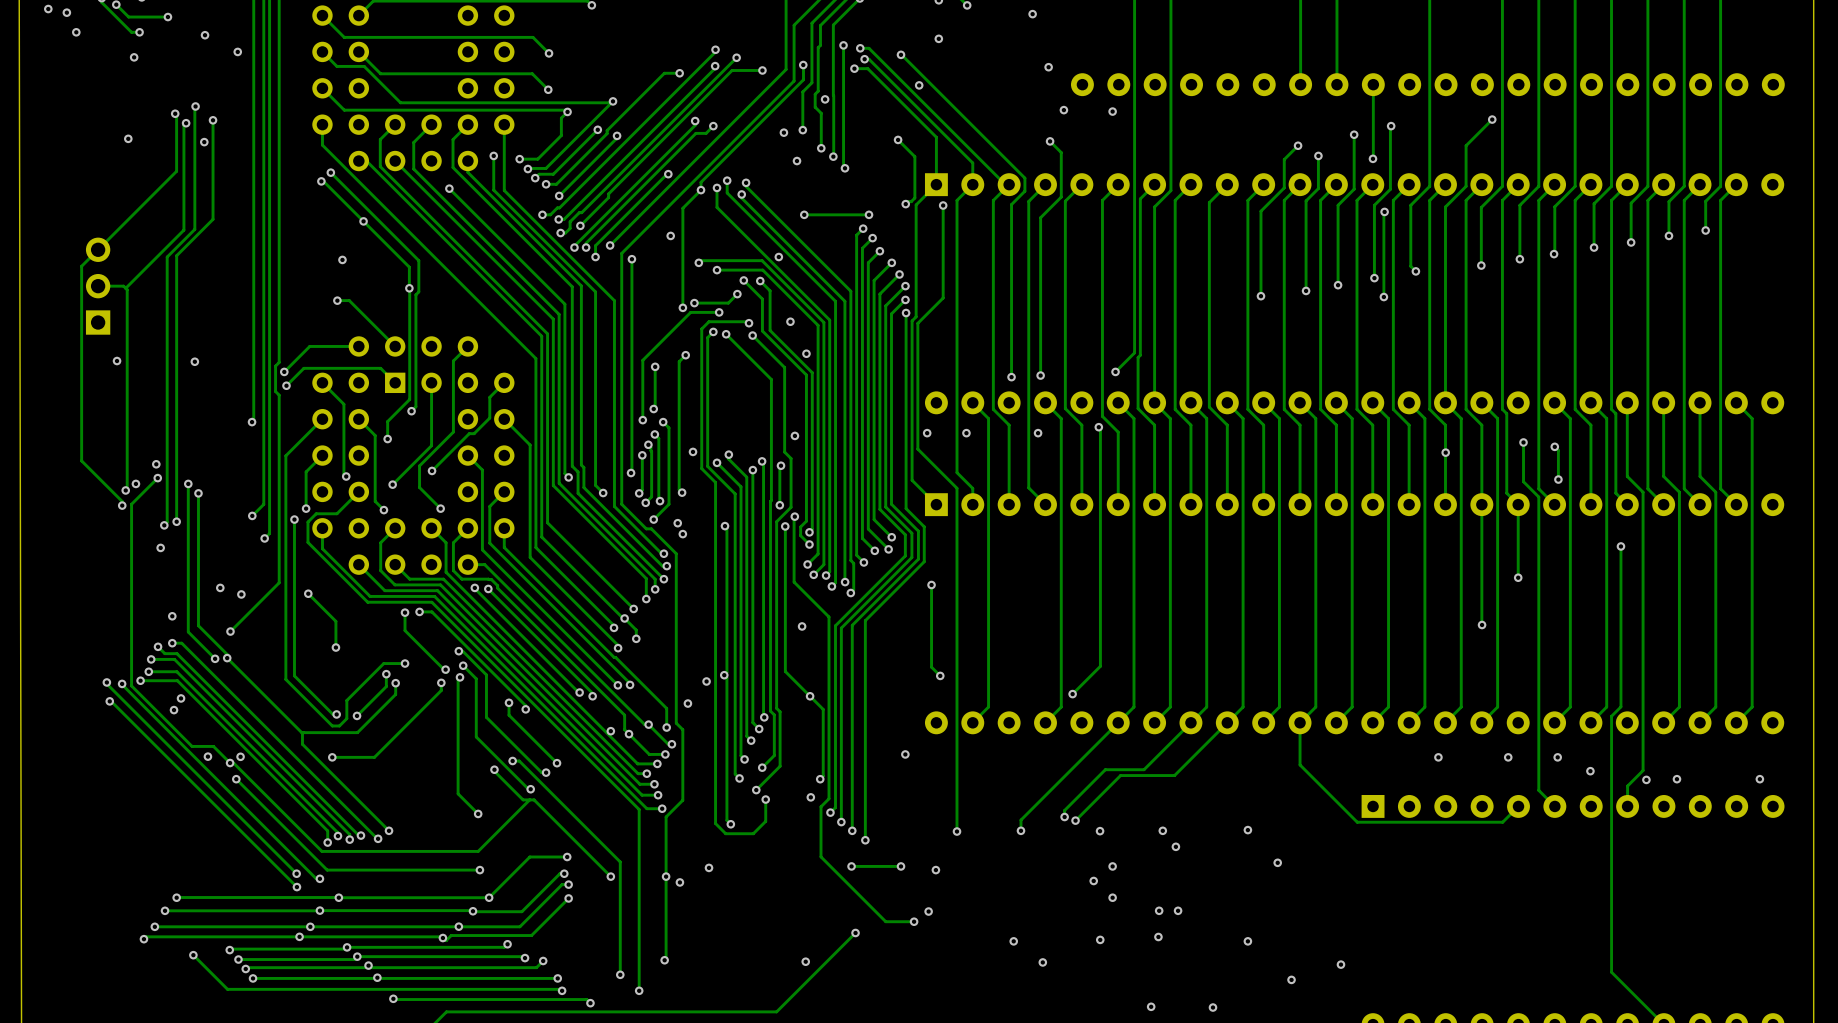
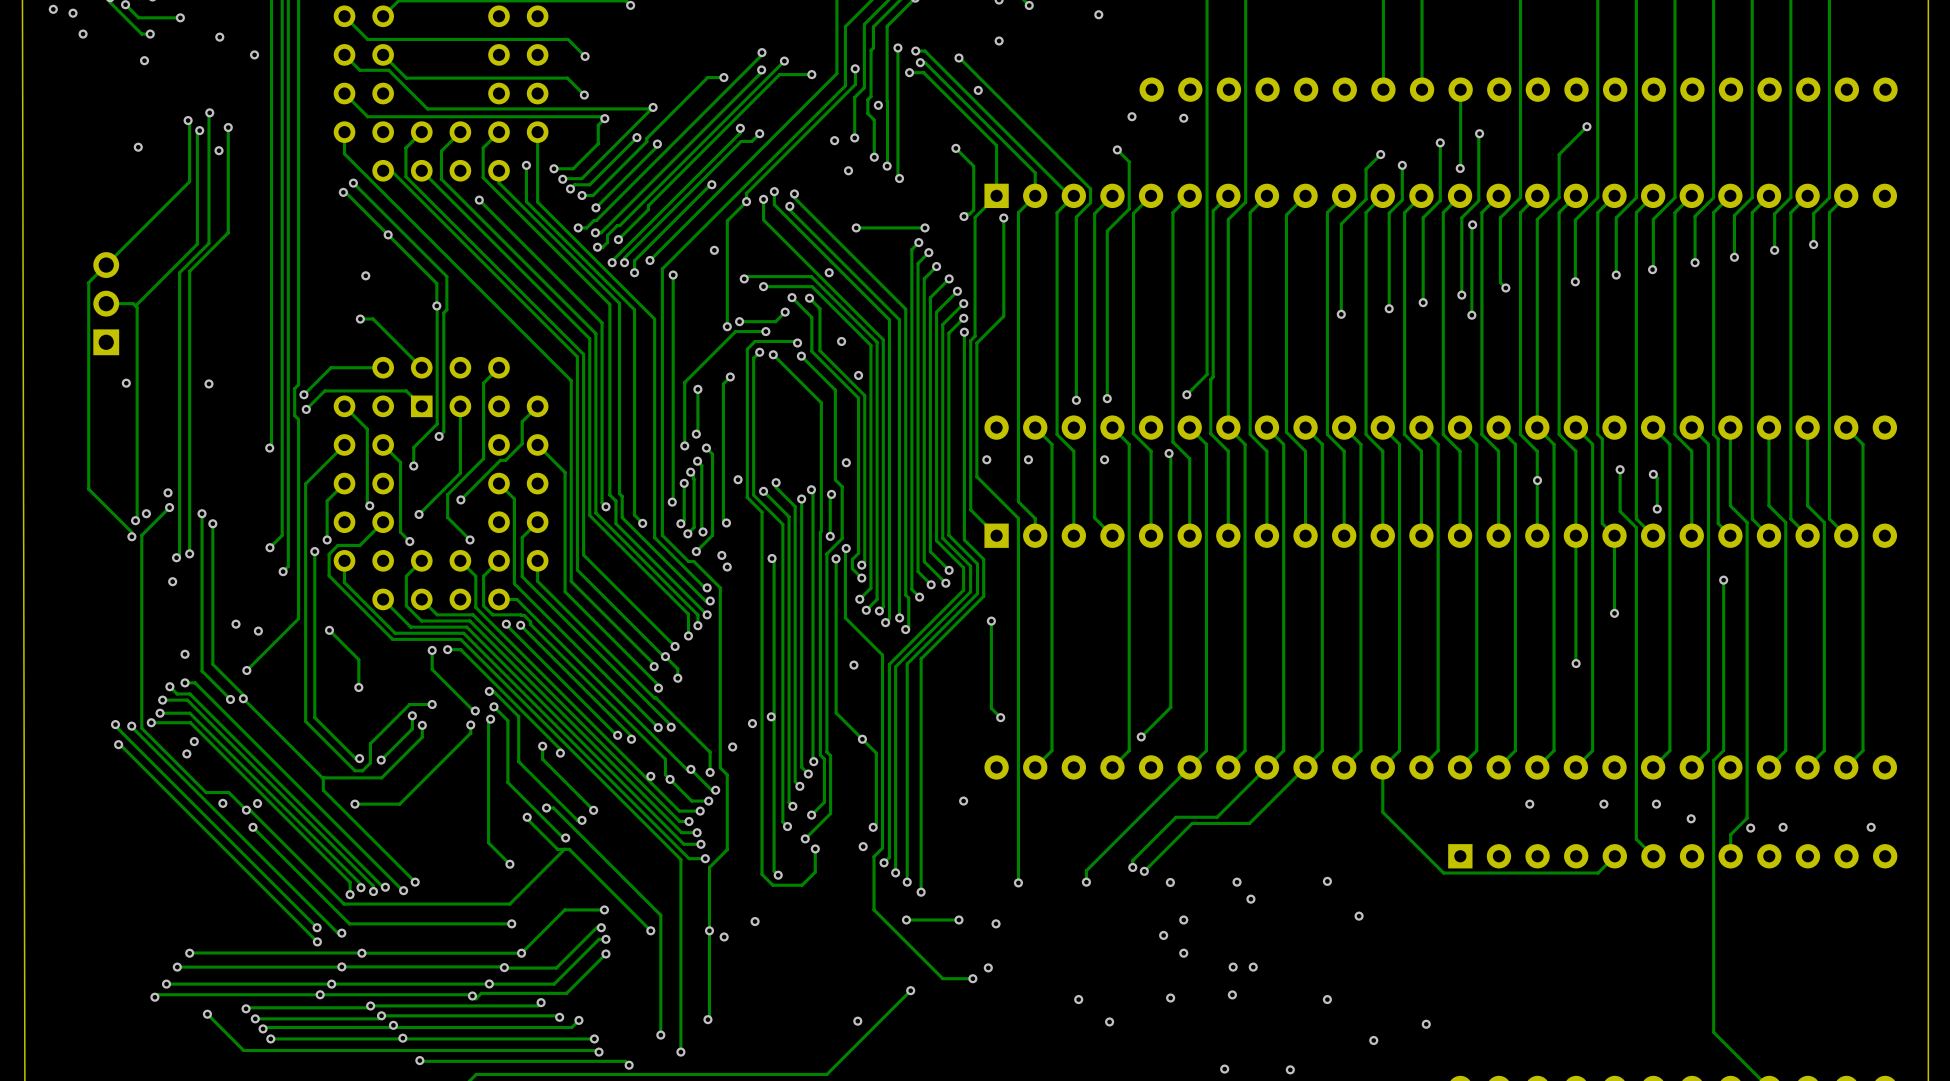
via: (1048, 67) -> none

